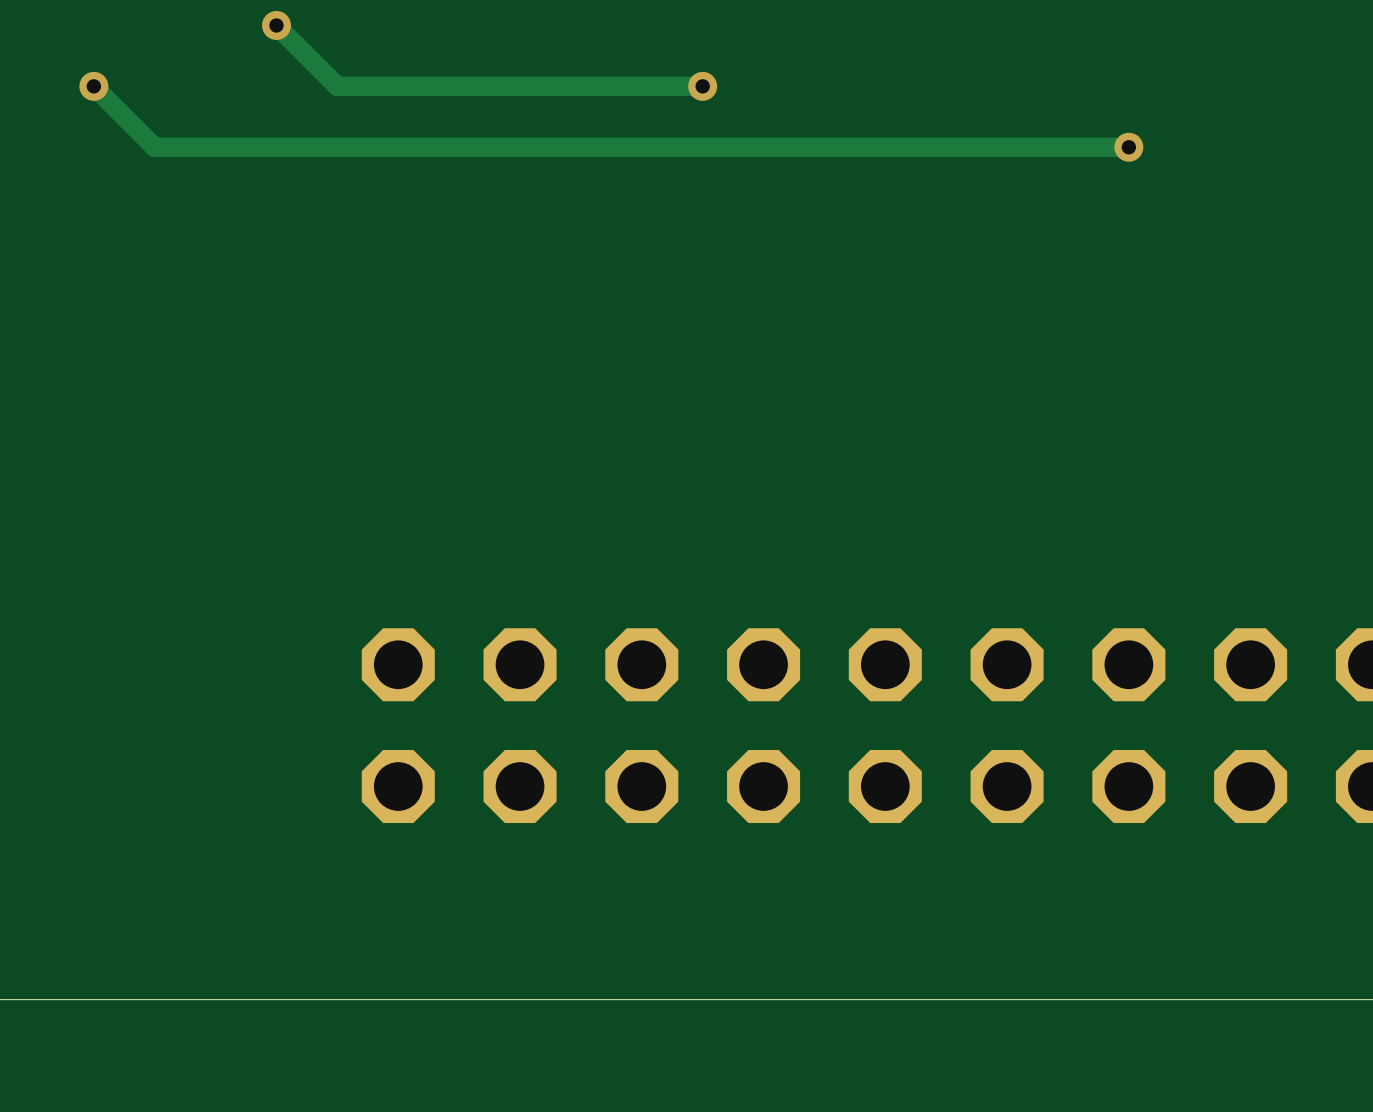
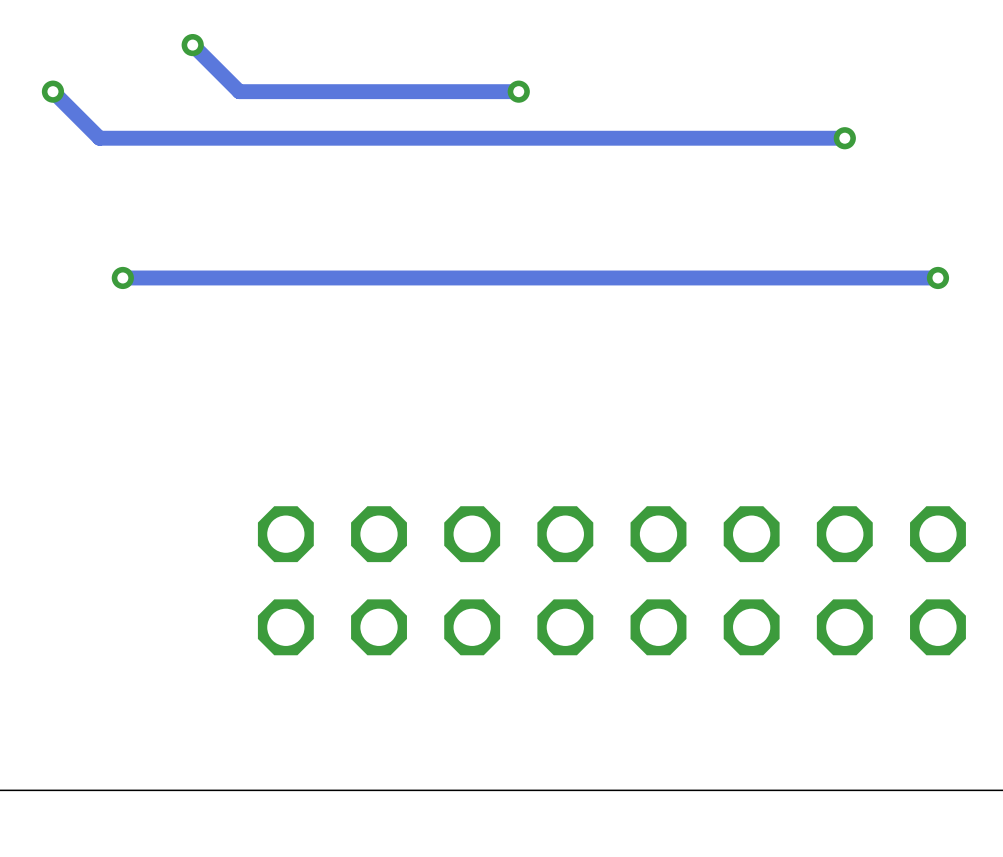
via: none -> (122, 277)
track: none -> (937, 277) (122, 277)
via: none -> (937, 277)

